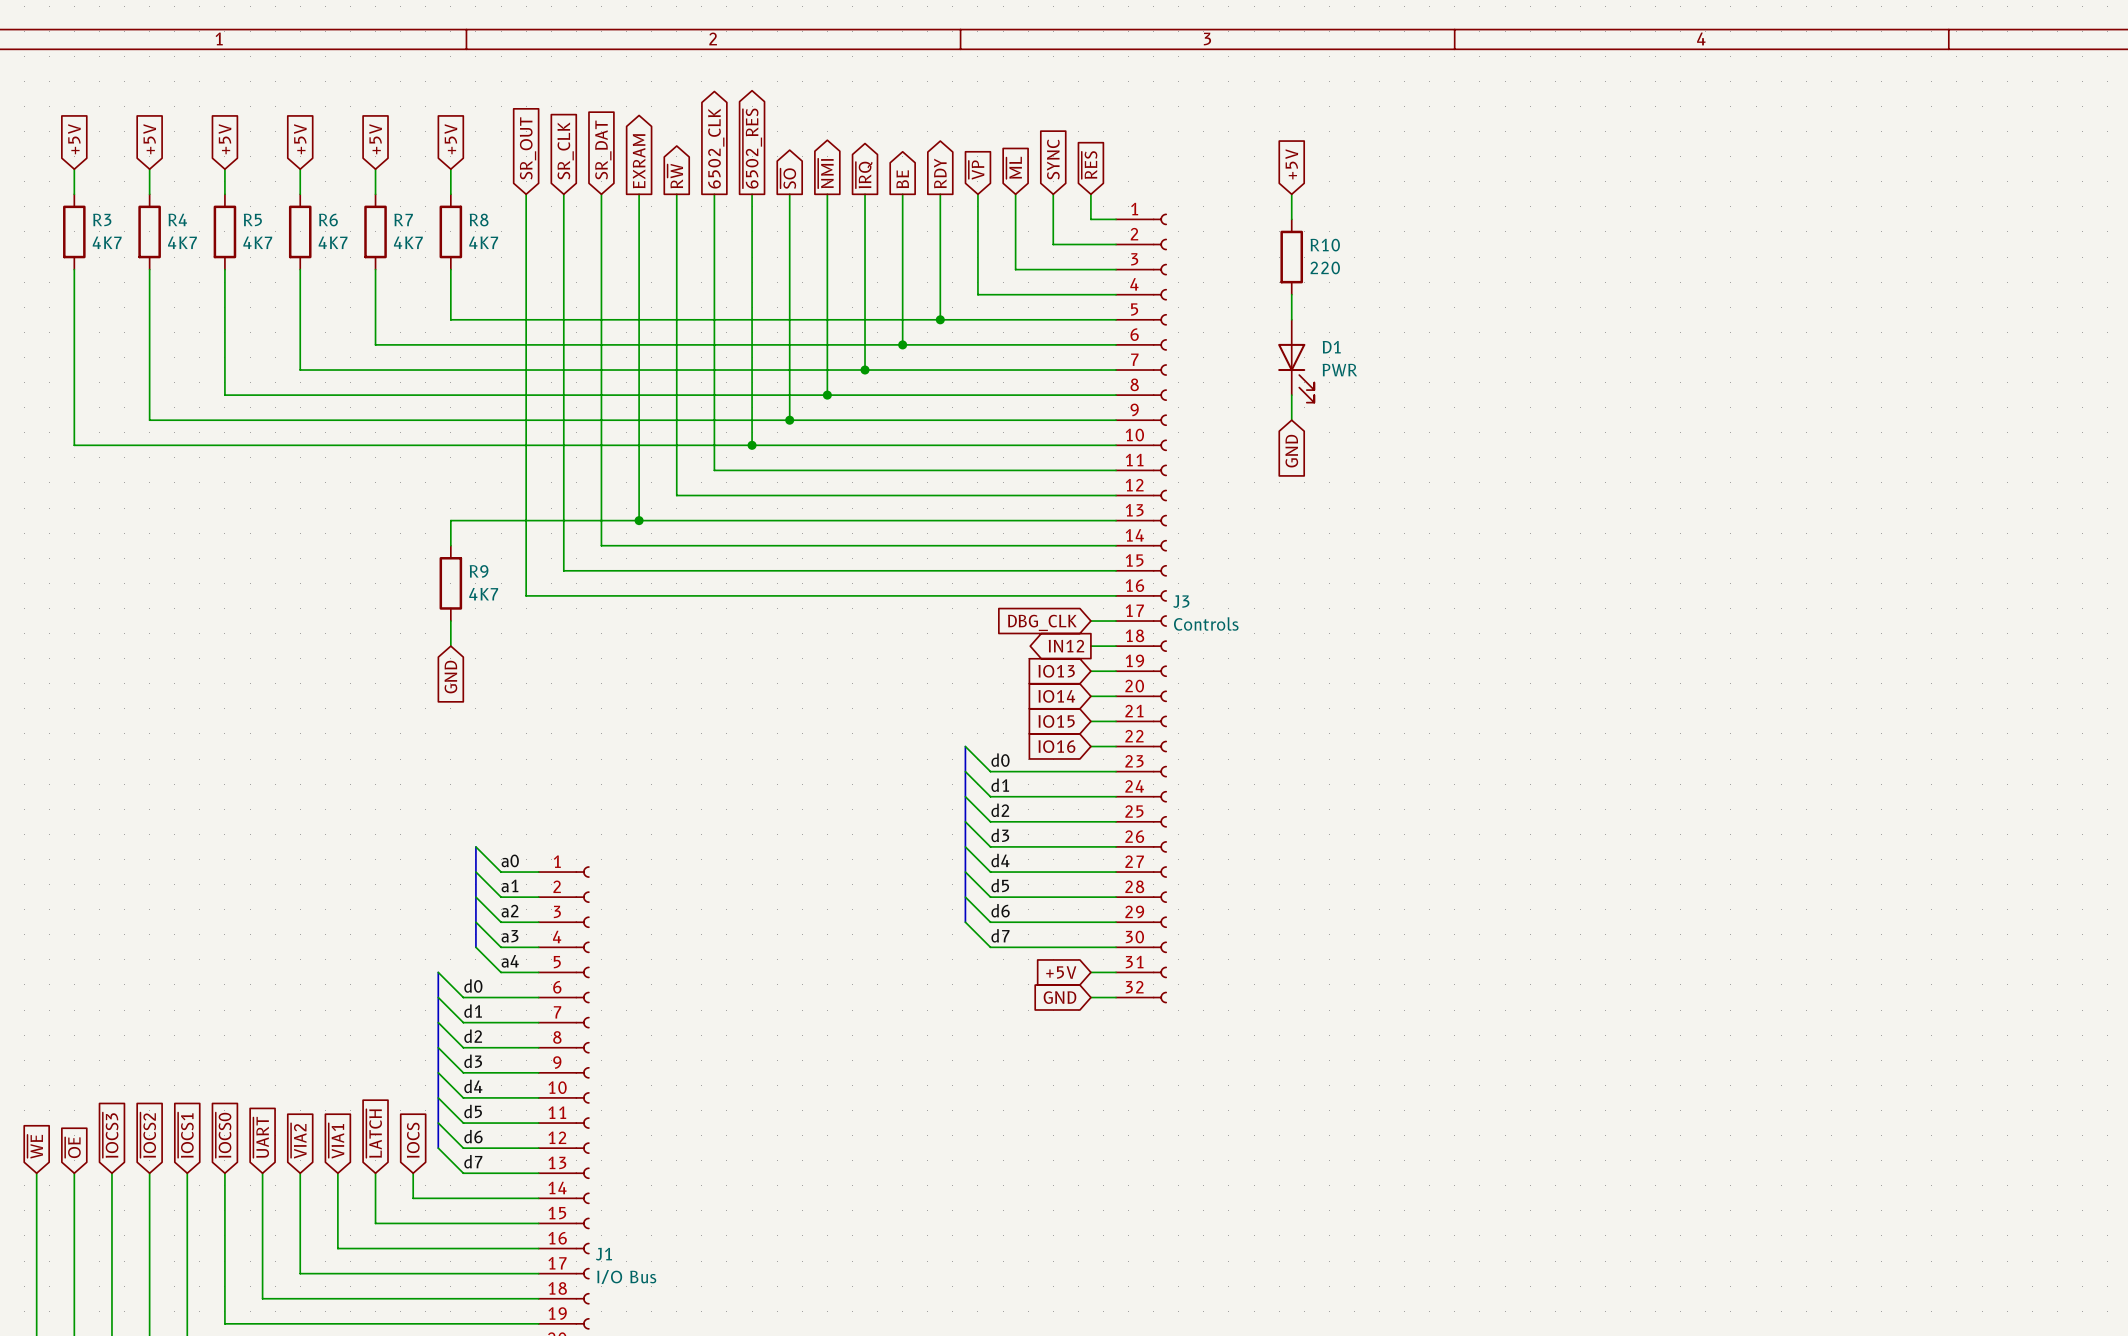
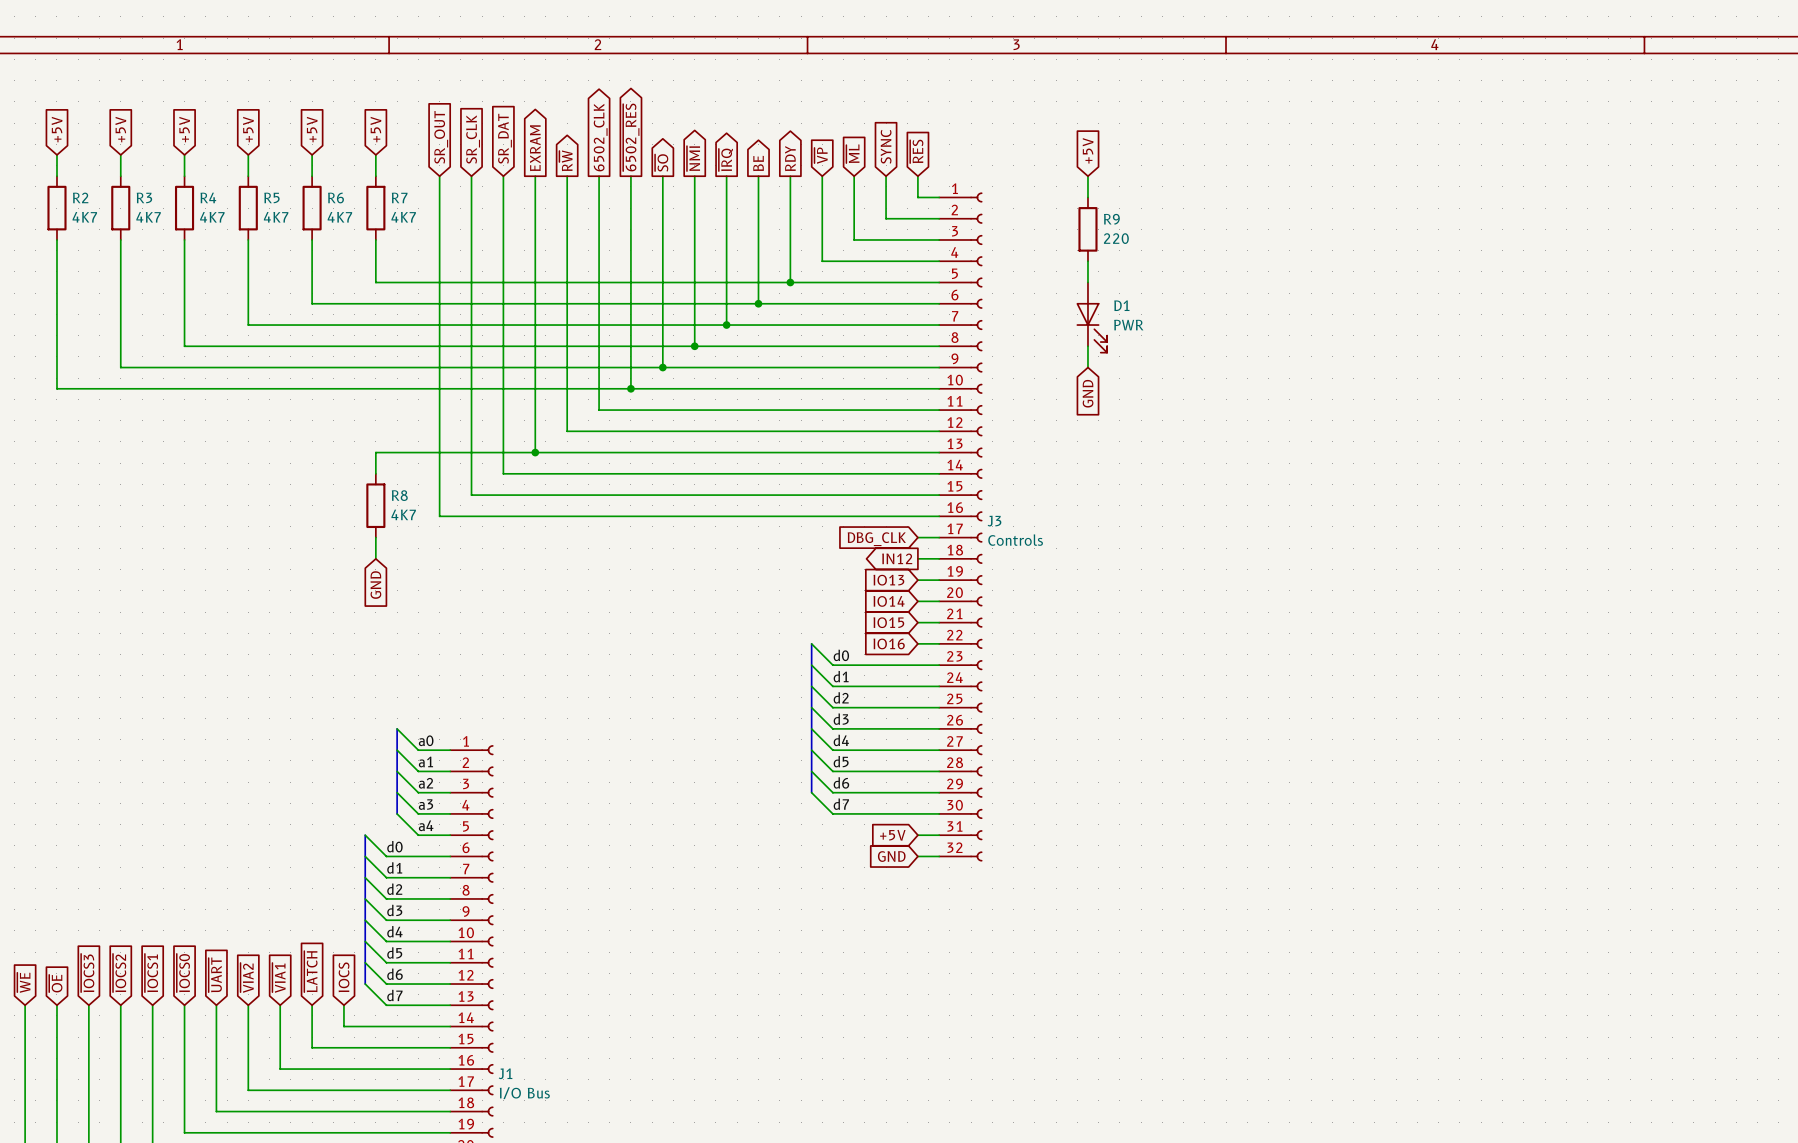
R3 name: R3 (102, 219) -> R2 (80, 197)
R4 name: R4 (177, 219) -> R3 (144, 197)
R5 name: R5 (252, 219) -> R4 (208, 197)
R7 name: R7 (403, 219) -> R6 (335, 198)
R6 name: R6 (328, 220) -> R5 (271, 197)
R8 name: R8 (479, 220) -> R7 (399, 197)
R10 name: R10 (1325, 245) -> R9 (1111, 219)
R9 name: R9 (479, 571) -> R8 (399, 495)

